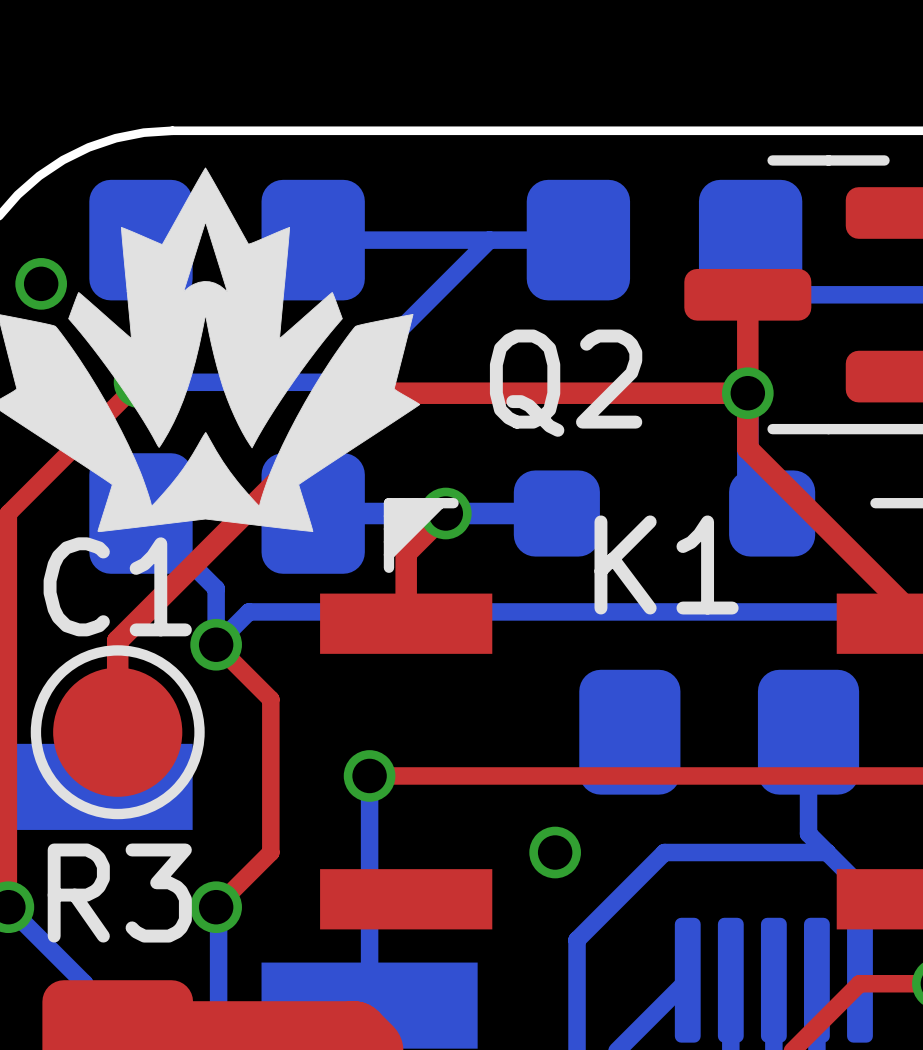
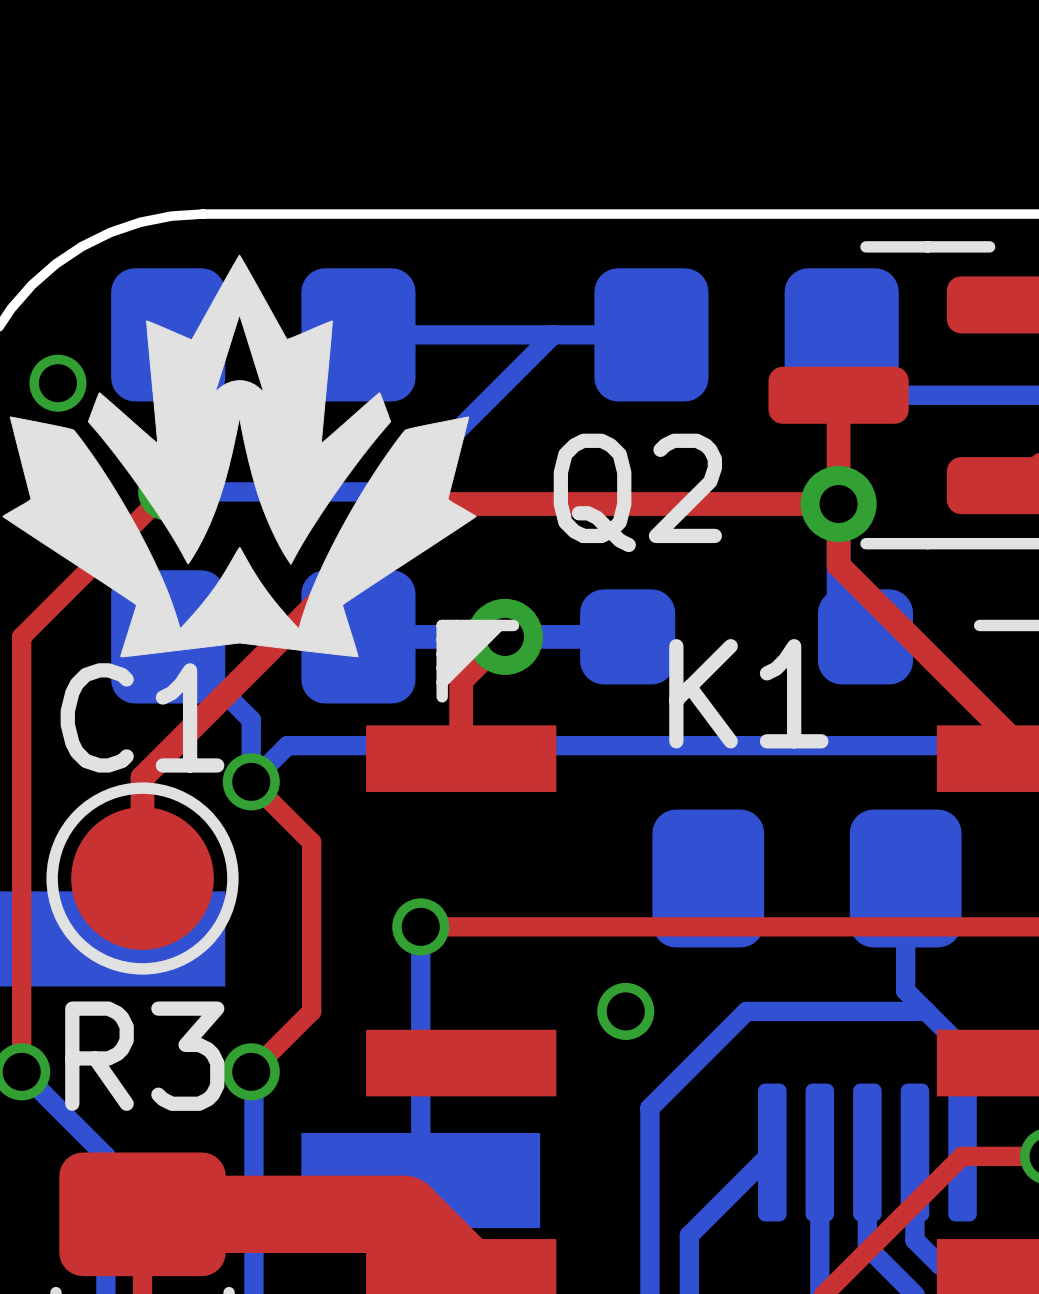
via size: [721, 367, 774, 420] -> [800, 465, 877, 543]
via size: [419, 487, 472, 540] -> [466, 598, 544, 675]

